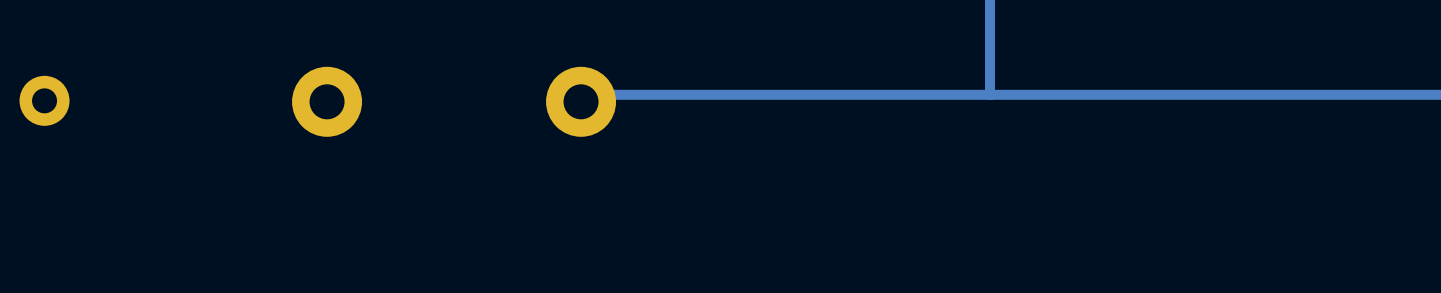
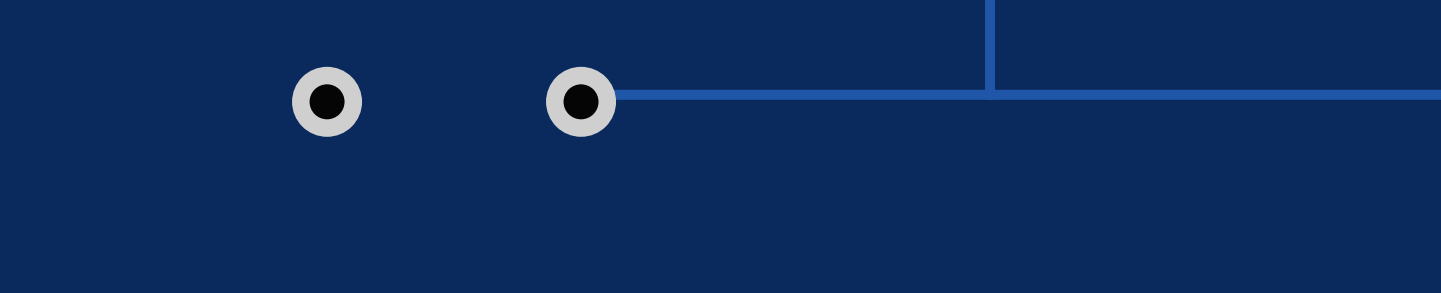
part: (44, 100) -> none

